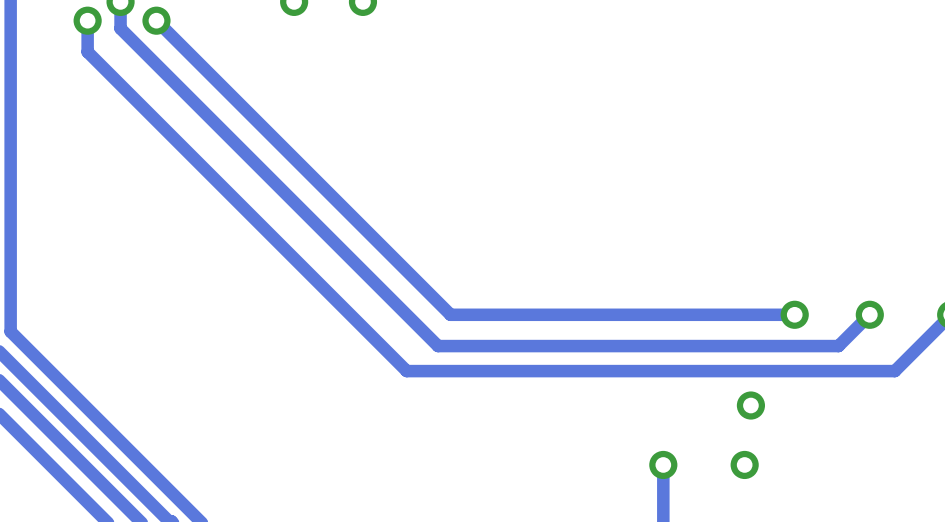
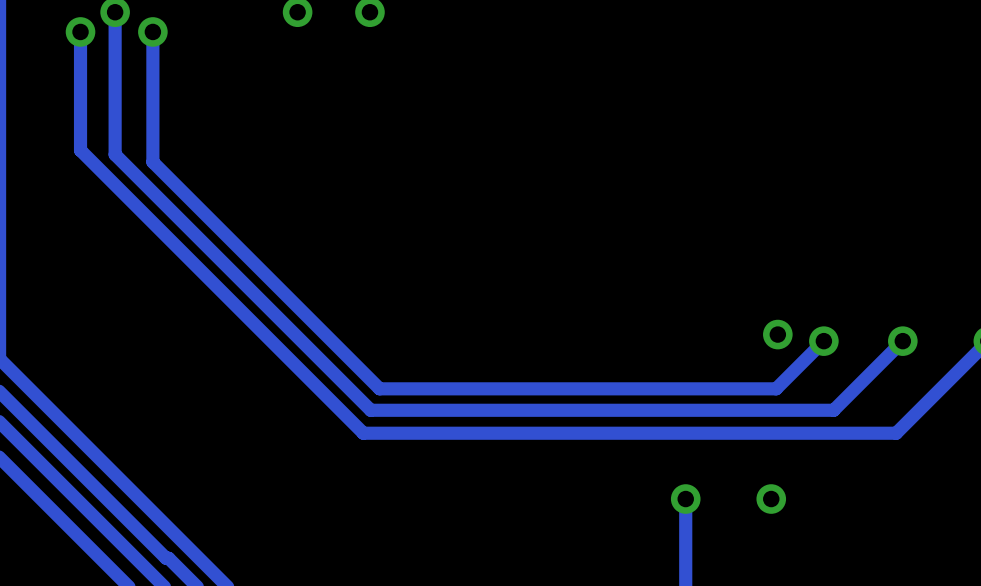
track: (156, 20) (450, 314) (794, 314) -> (152, 31) (152, 162) (379, 388) (776, 388) (823, 341)
track: (120, 28) (438, 346) (838, 346) -> (115, 40) (115, 154) (370, 410) (833, 410) (869, 374)
track: (87, 51) (406, 371) (894, 371) -> (80, 64) (80, 150) (363, 433) (896, 433) (929, 400)
via position: (750, 405) -> (777, 334)

